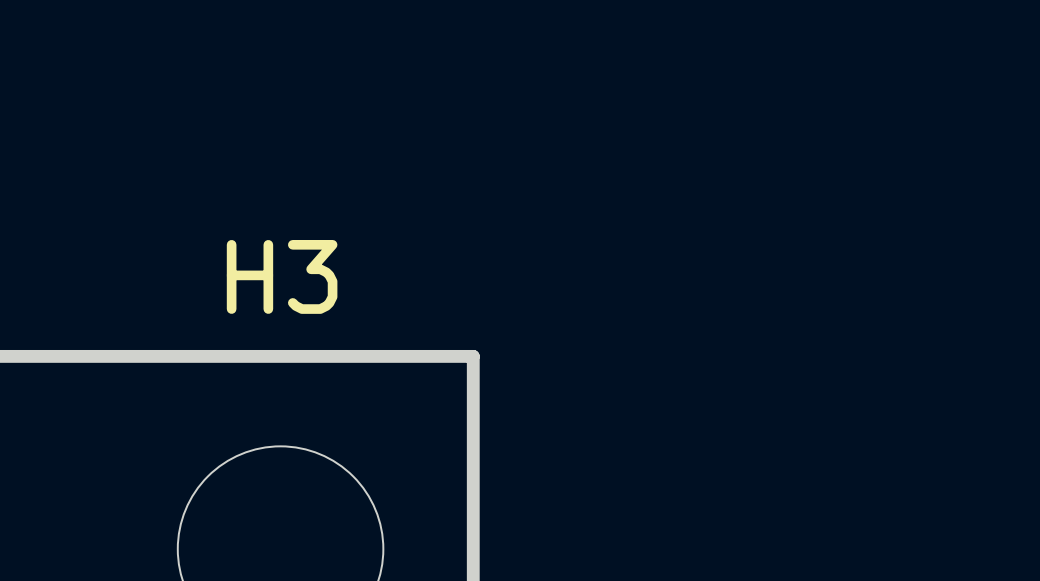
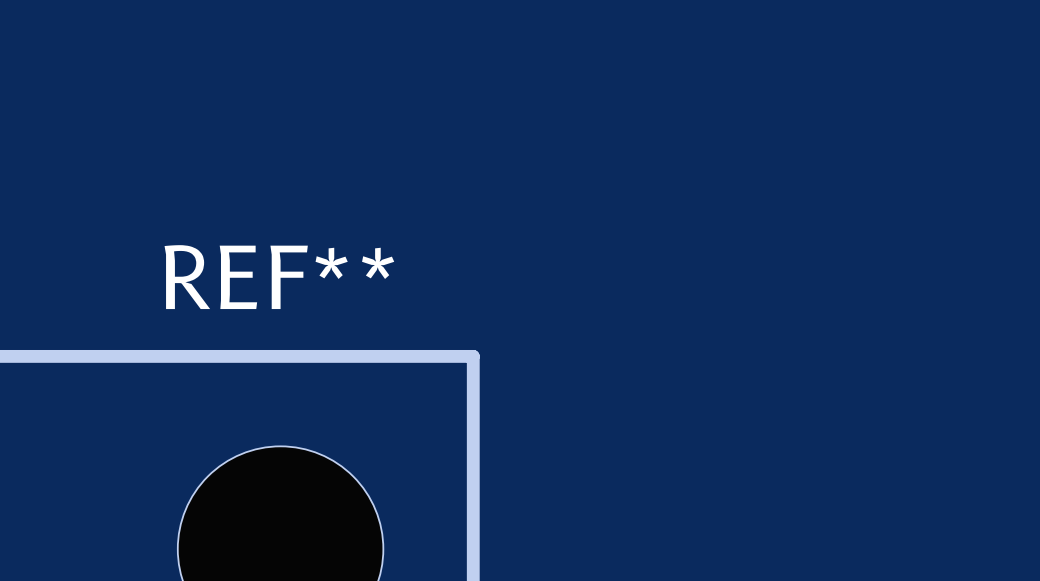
H3 name: H3 (282, 276) -> REF** (279, 277)

